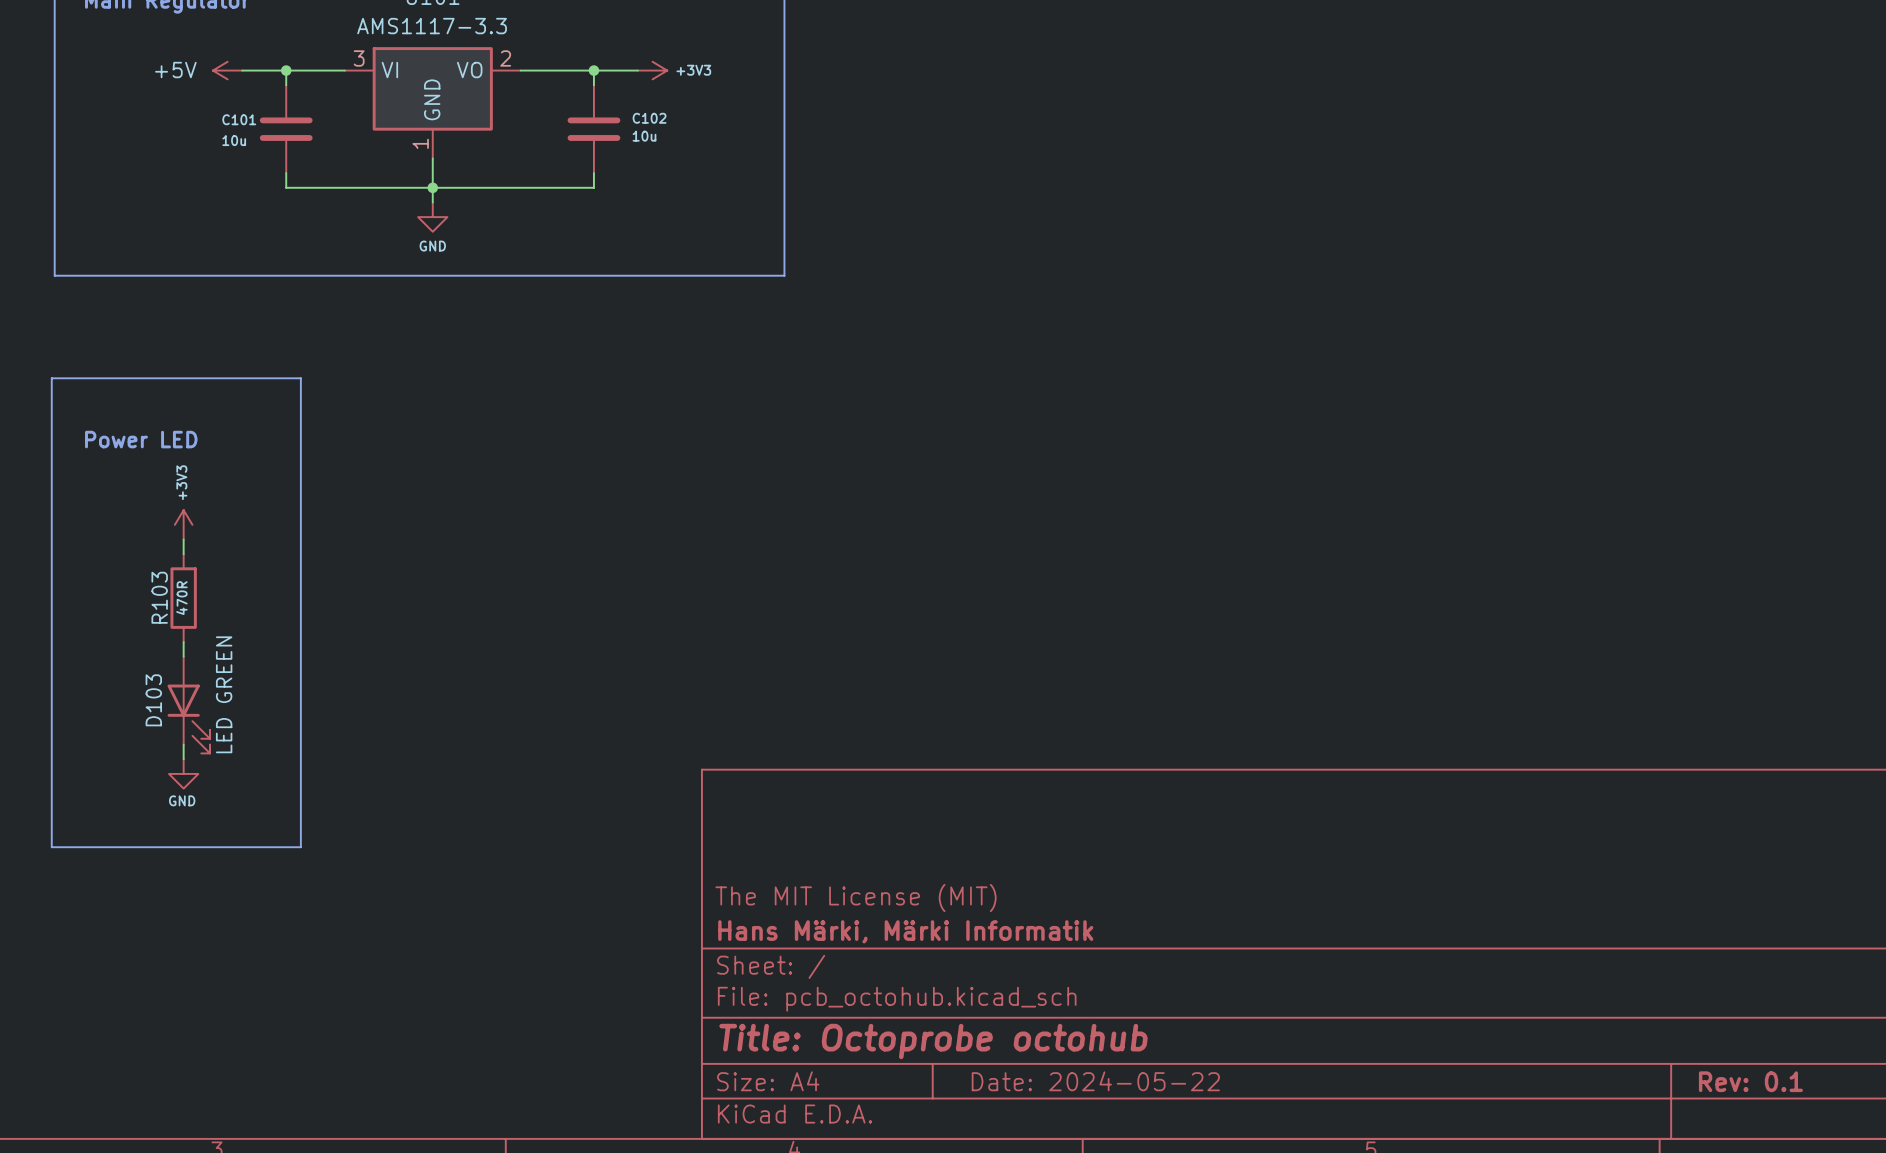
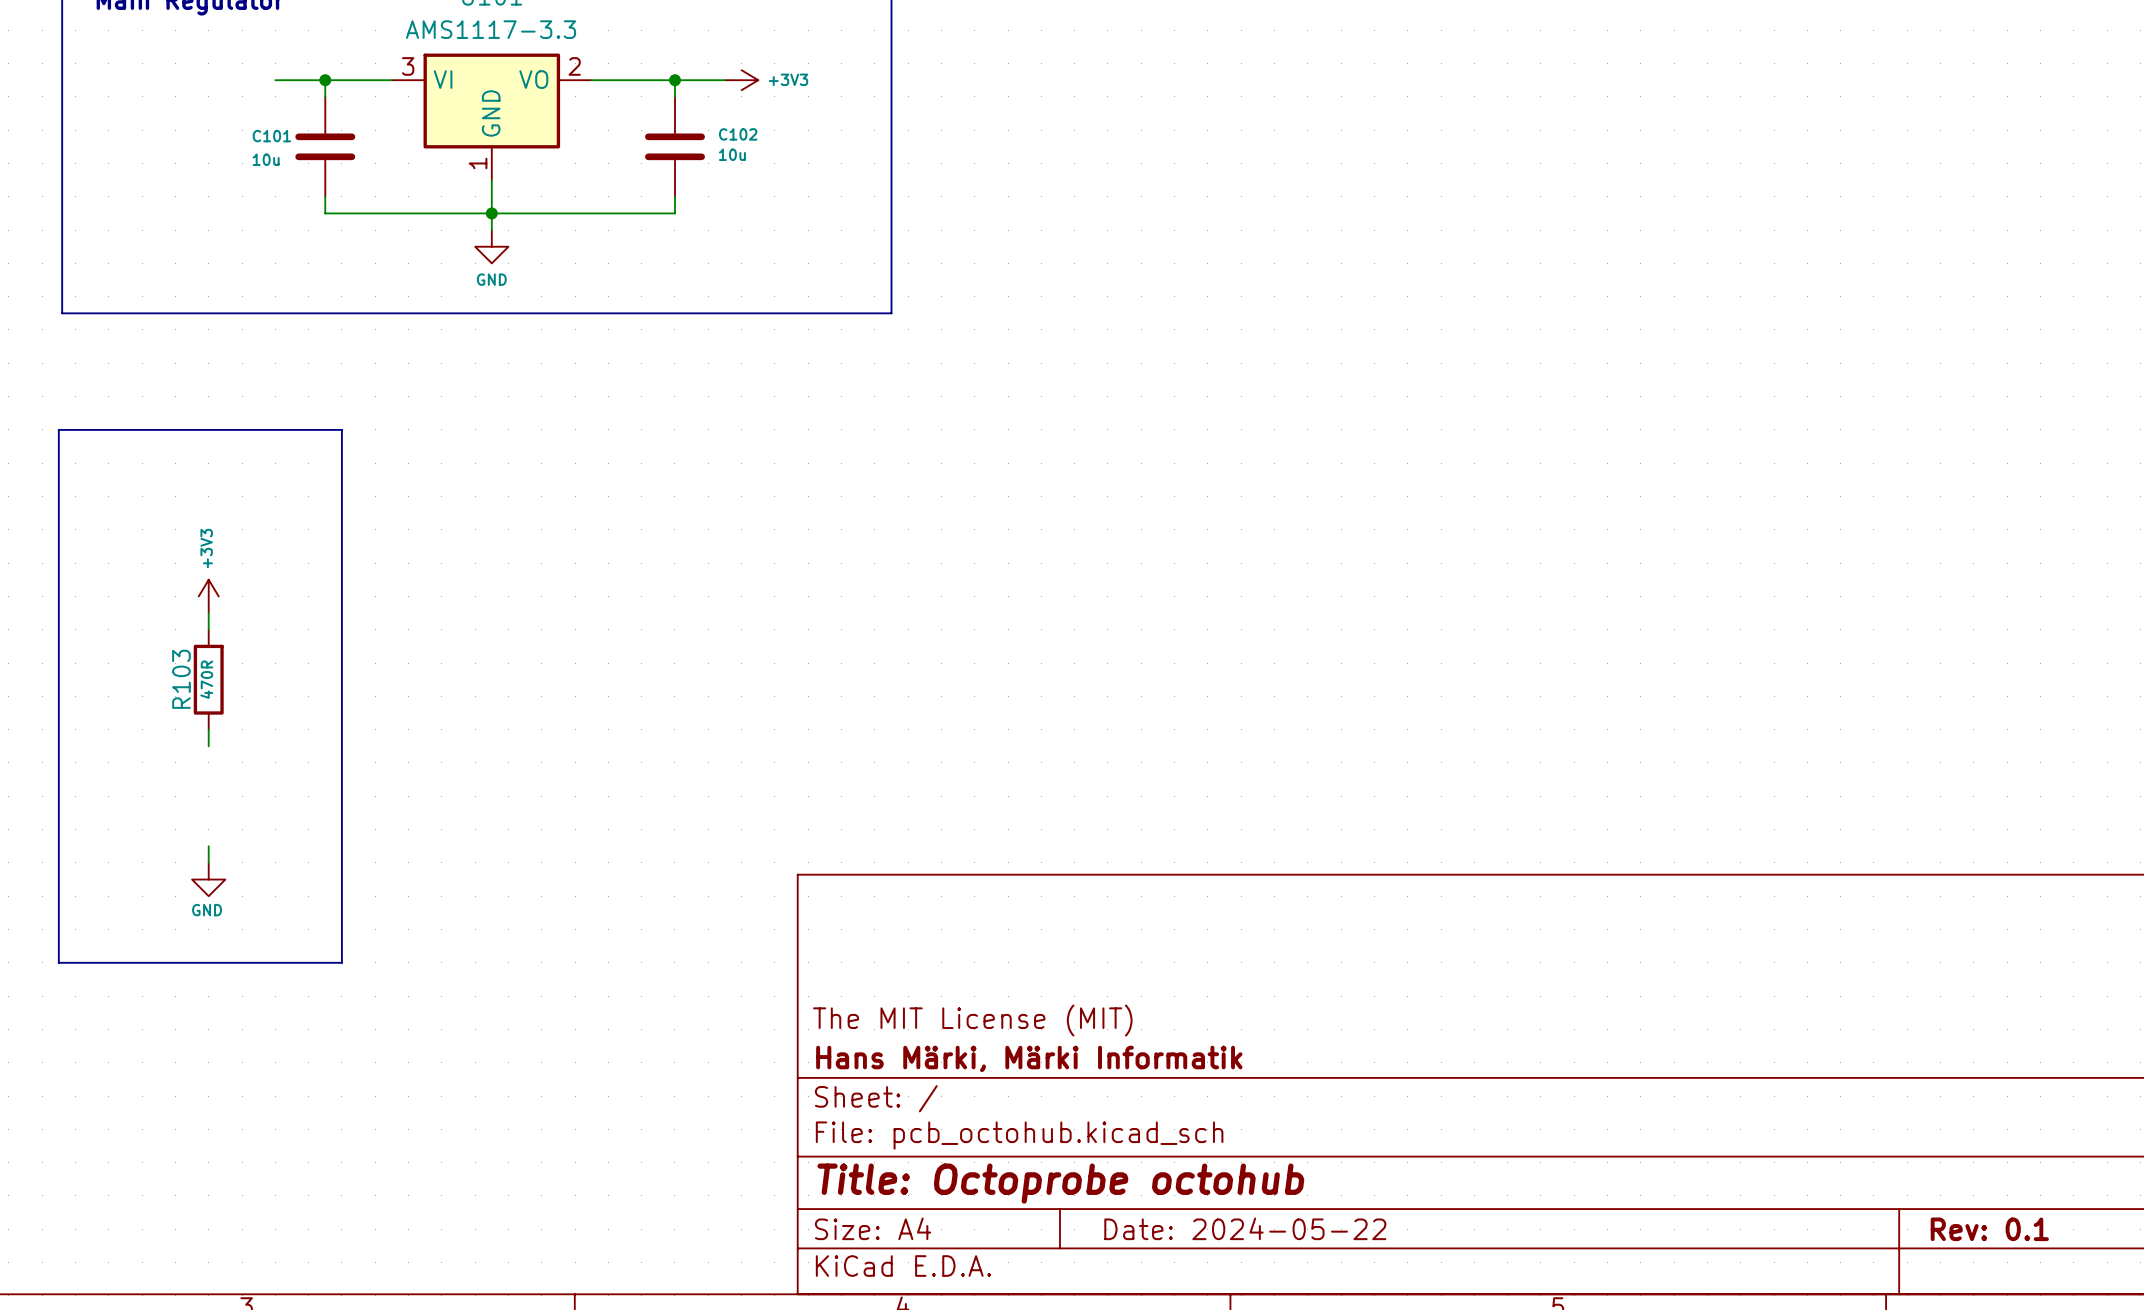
power symbol: +5V (227, 70) -> none
text: Power LED (141, 439) -> none
D103: LED GREEN (188, 705) -> none

